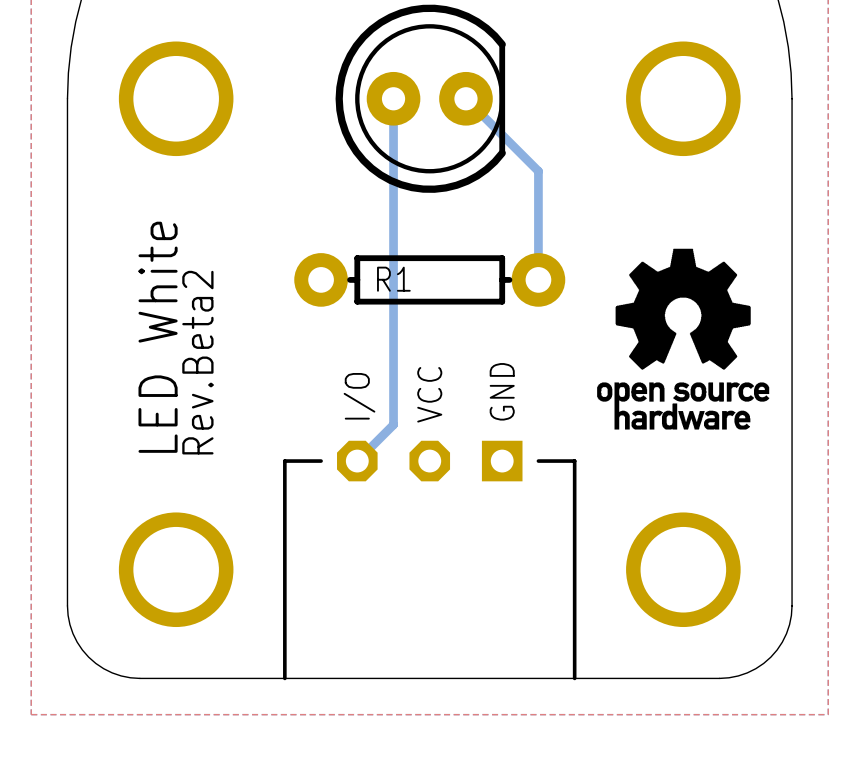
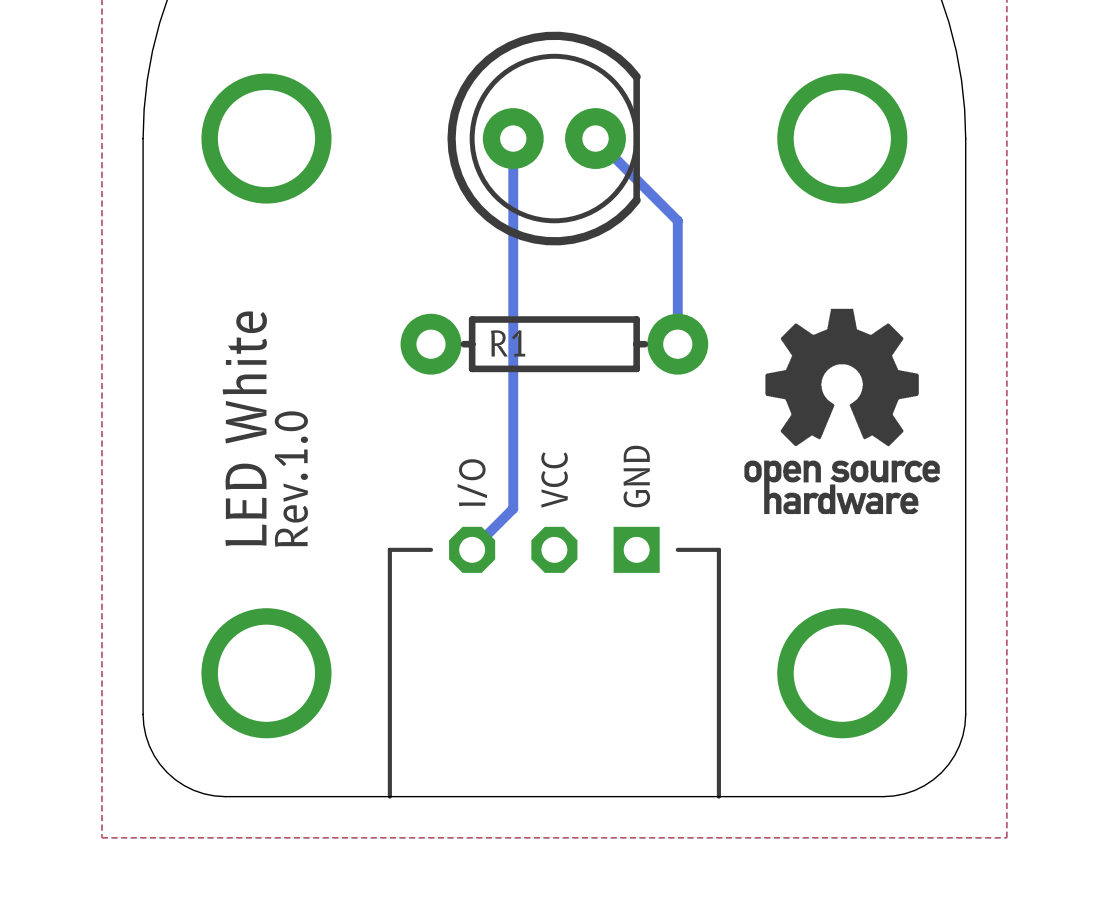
text: Rev.Beta2 (197, 362) -> Rev.1.0 (291, 479)

